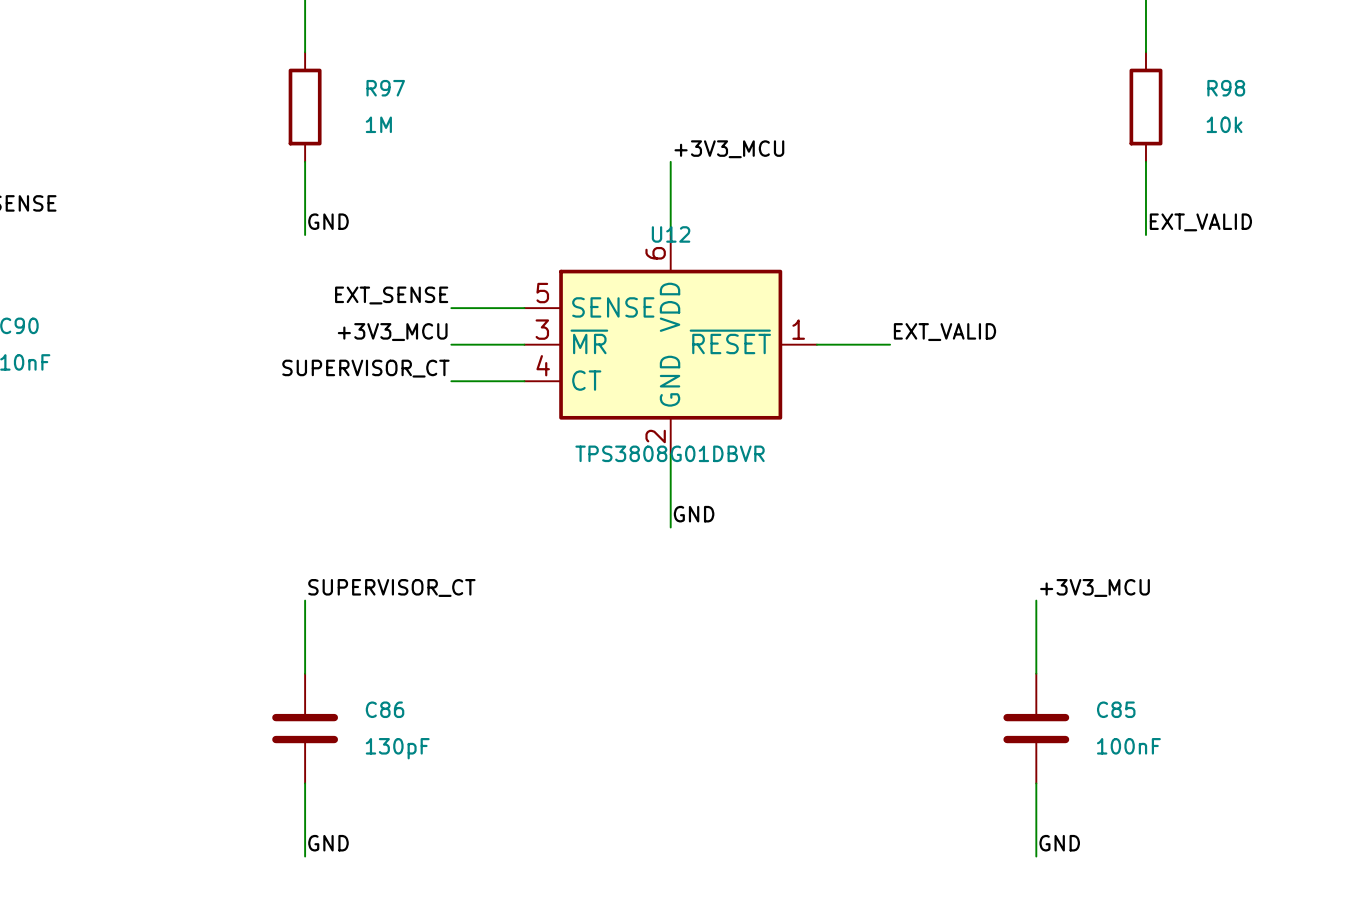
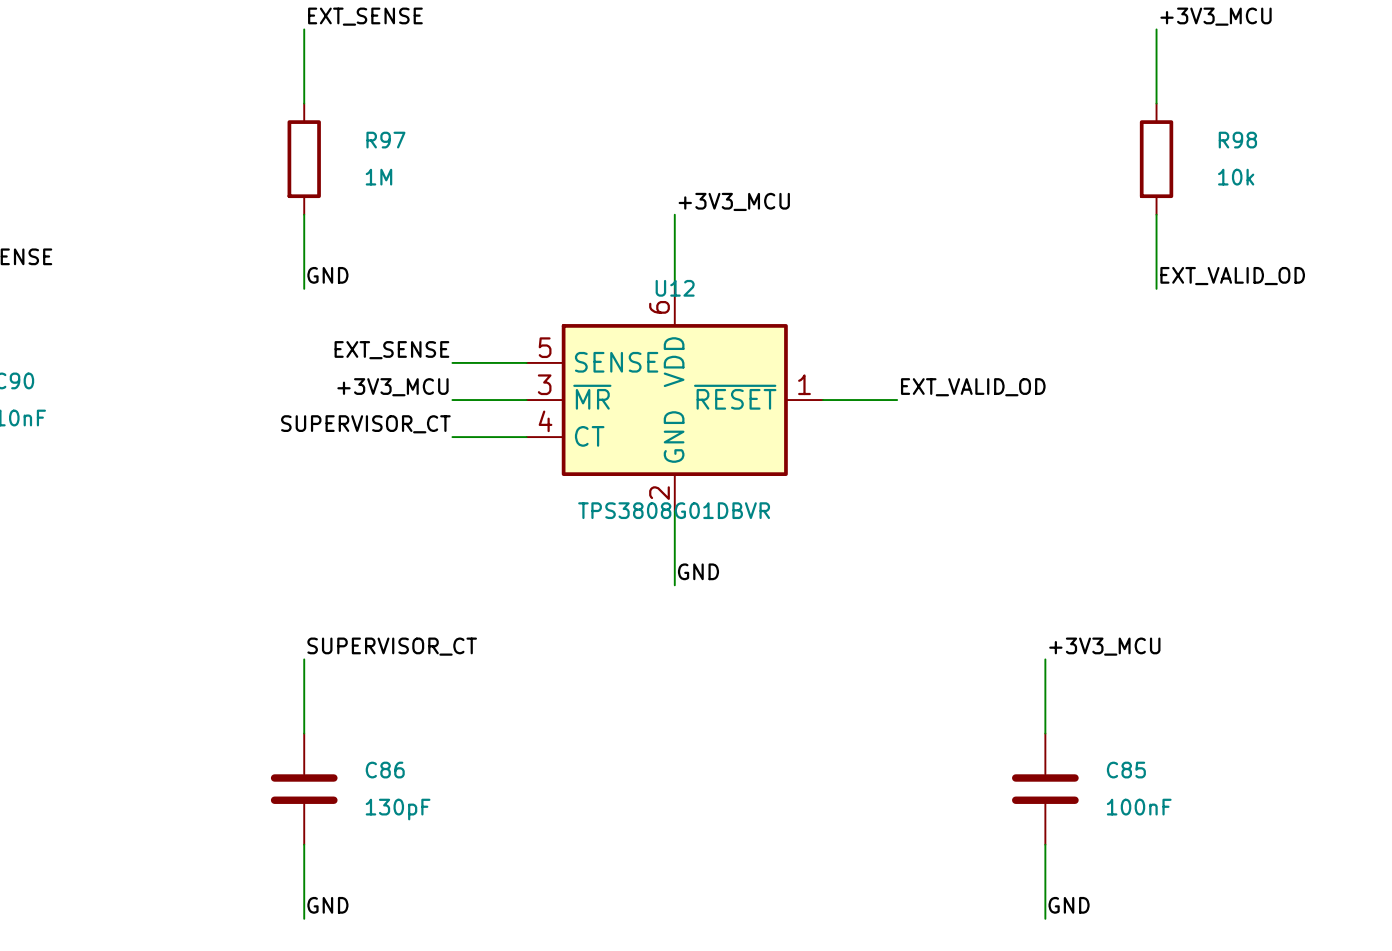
label: EXT_VALID (1200, 222) -> EXT_VALID_OD (1232, 276)
label: EXT_VALID (944, 332) -> EXT_VALID_OD (973, 387)

